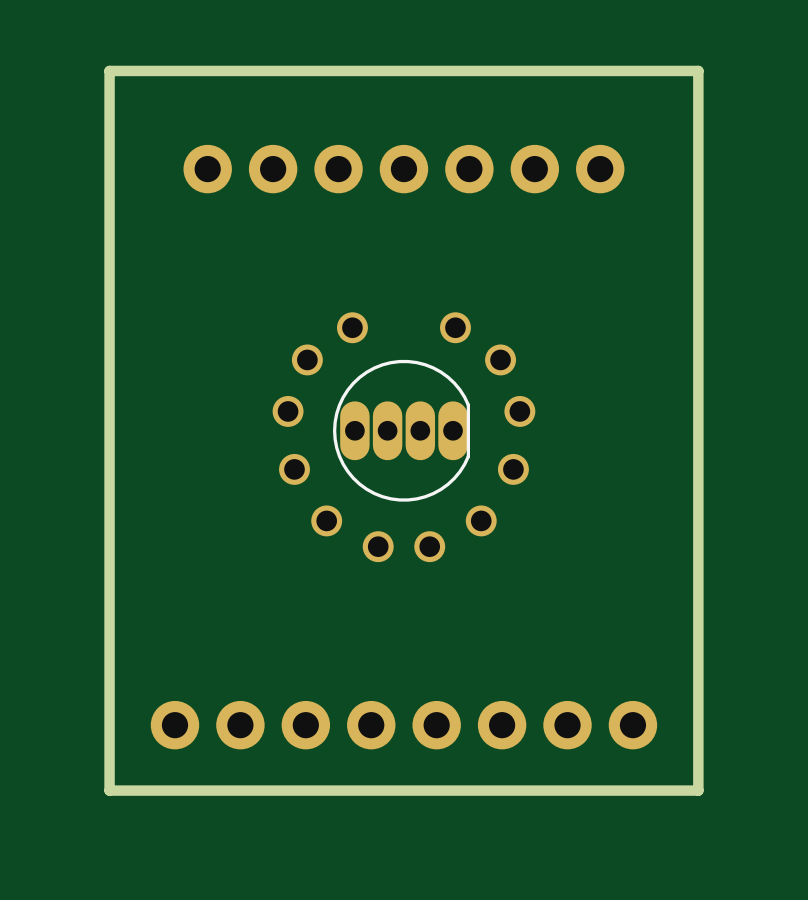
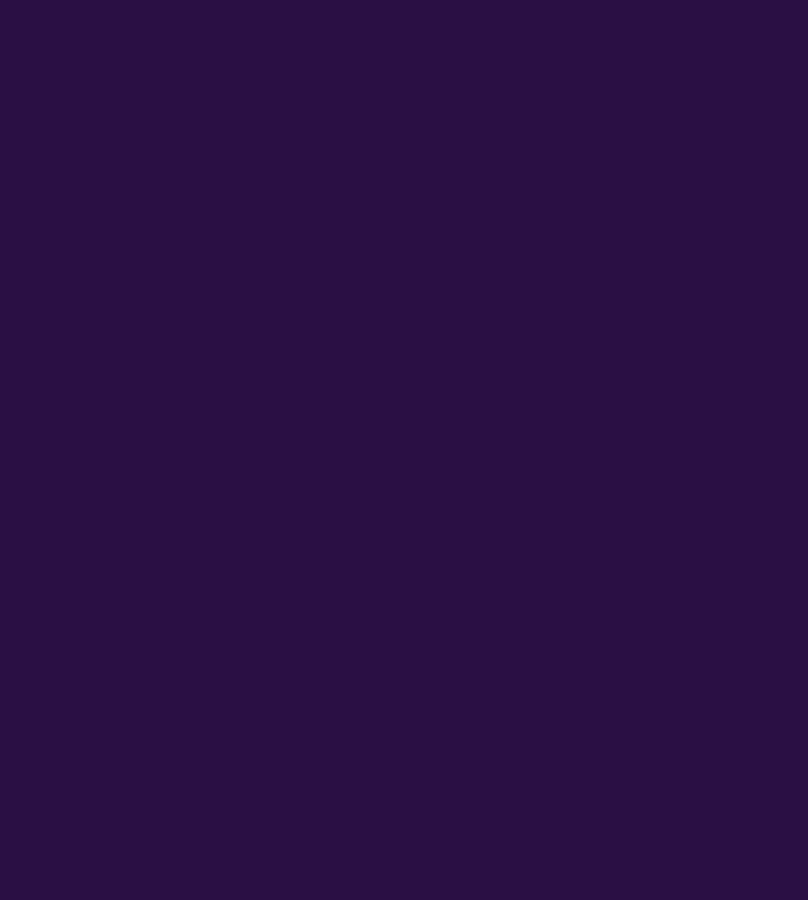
board edge: (109, 70) (109, 790) (698, 790) (698, 70) (109, 70) -> none
part: (403, 169) -> none
part: (401, 430) -> none
part: (403, 437) -> none
part: (403, 725) -> none

